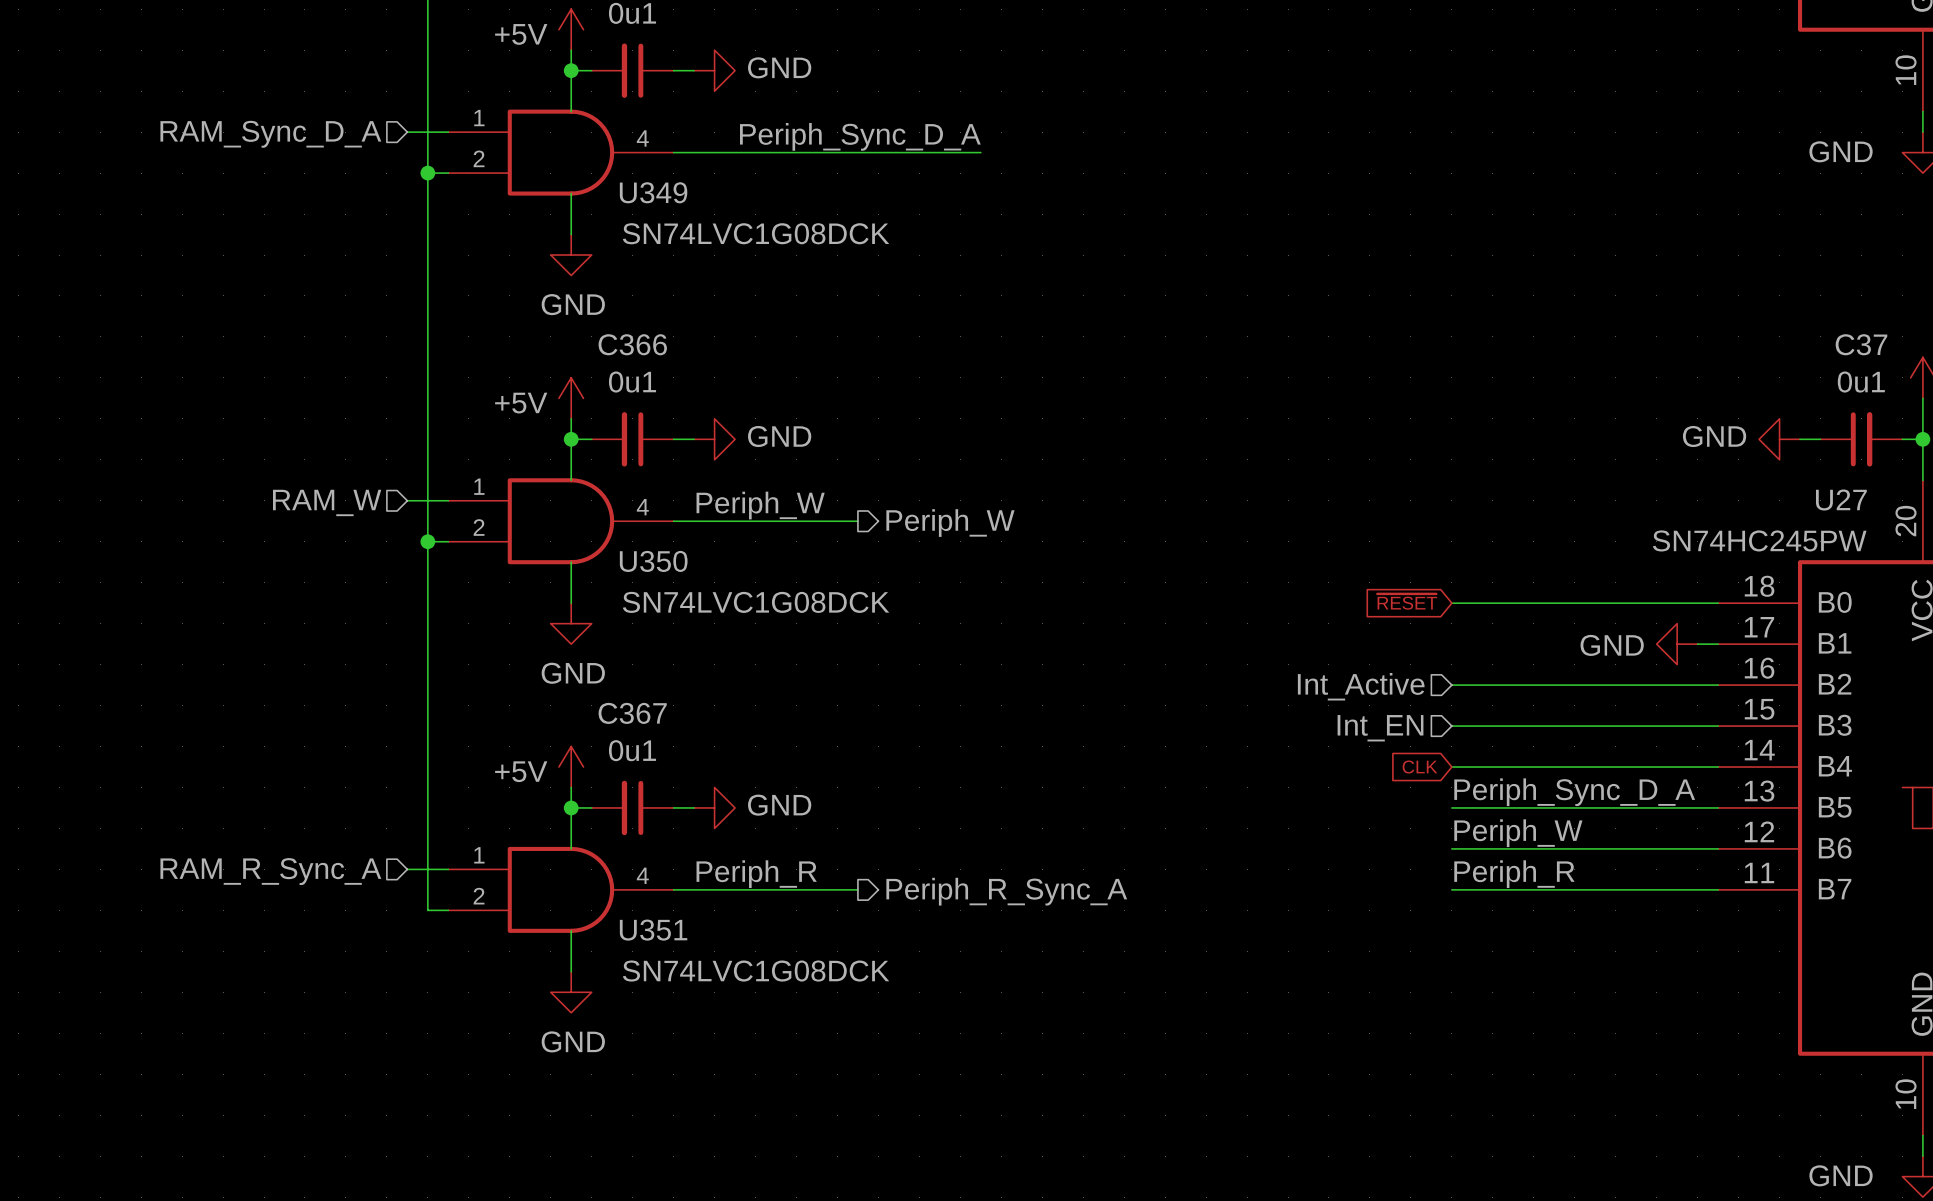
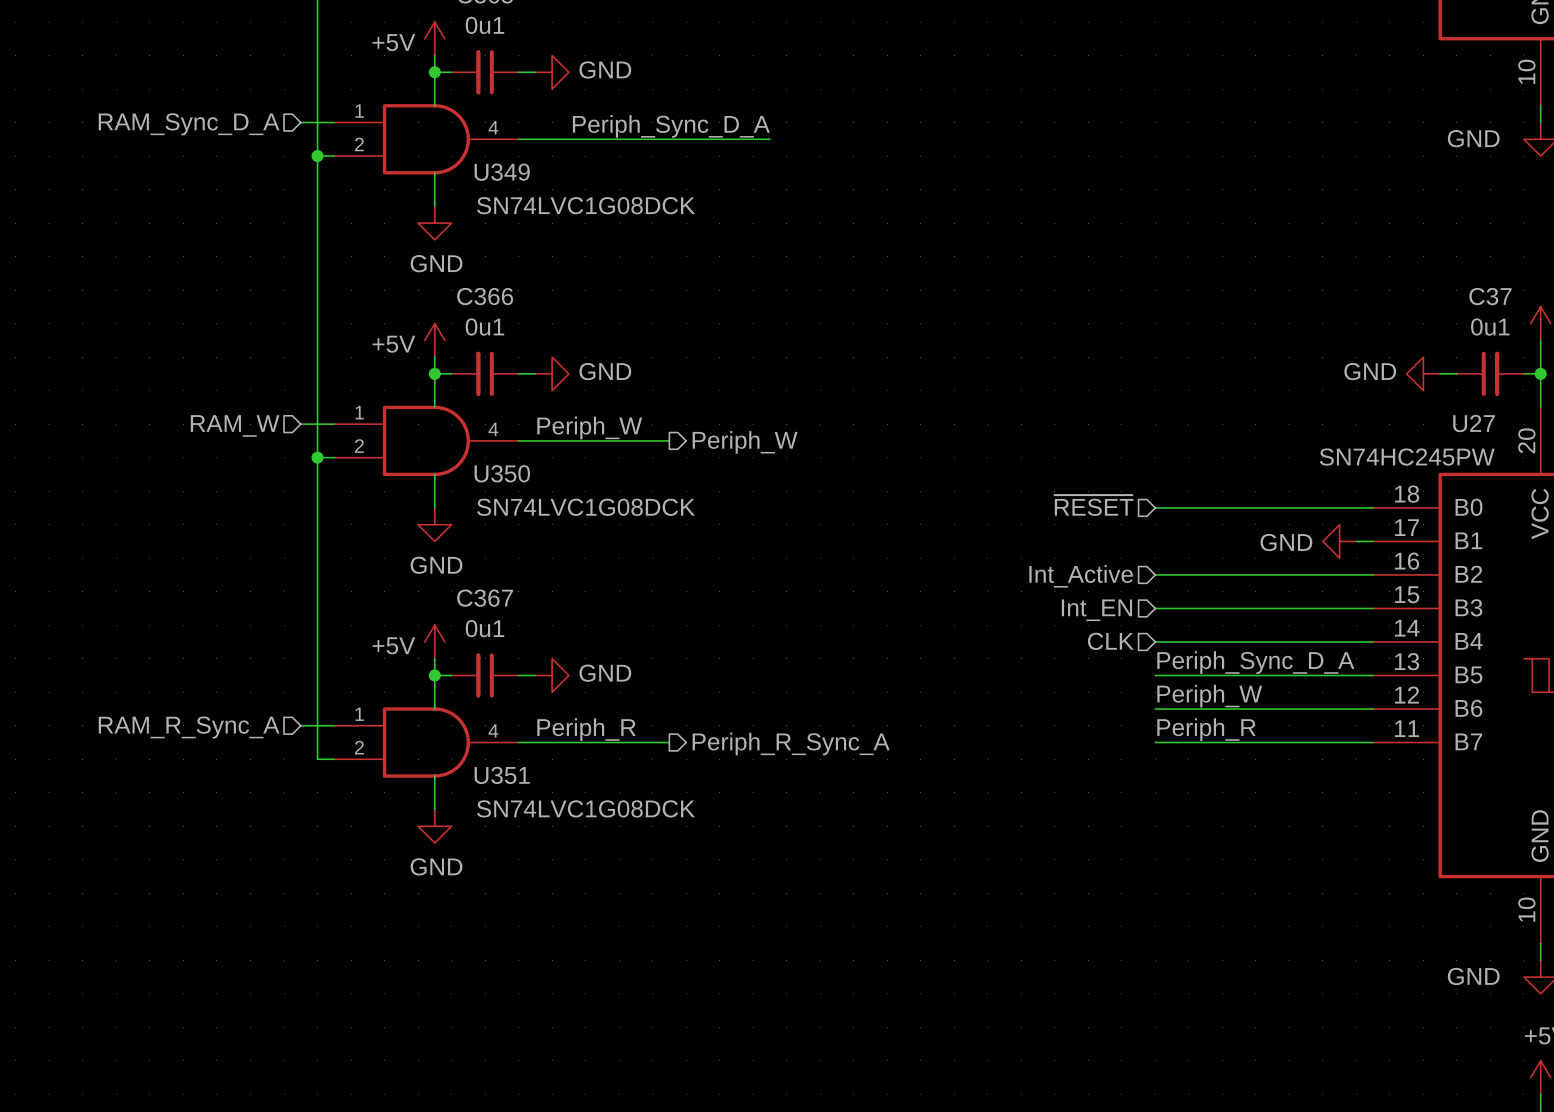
hierarchical label: none -> ~{RESET} (1093, 505)
global label: ~{RESET} (1407, 601) -> none
hierarchical label: none -> CLK (1110, 641)
global label: CLK (1419, 767) -> none

